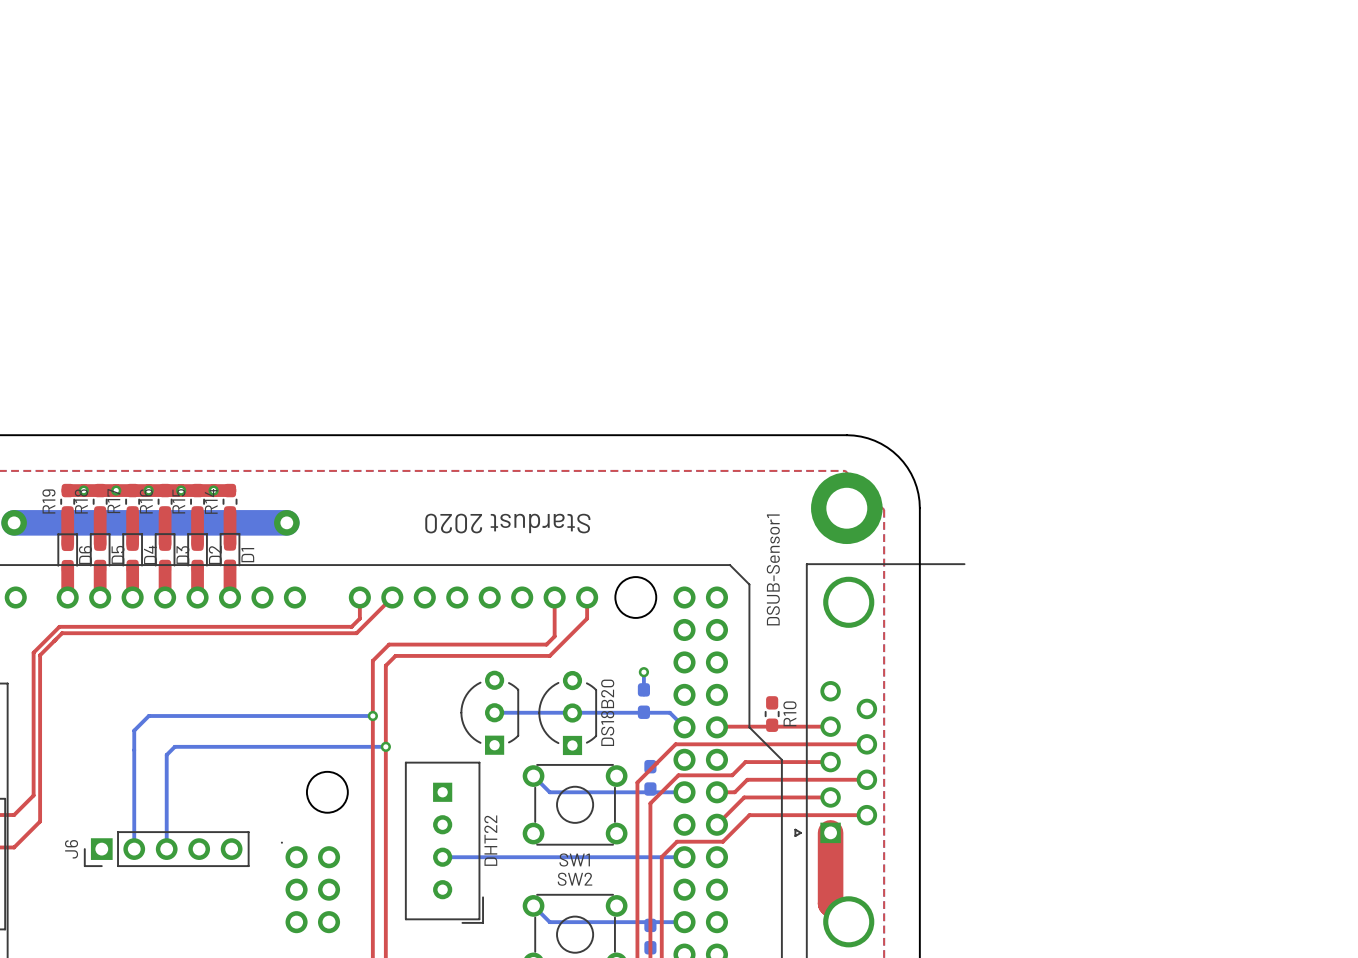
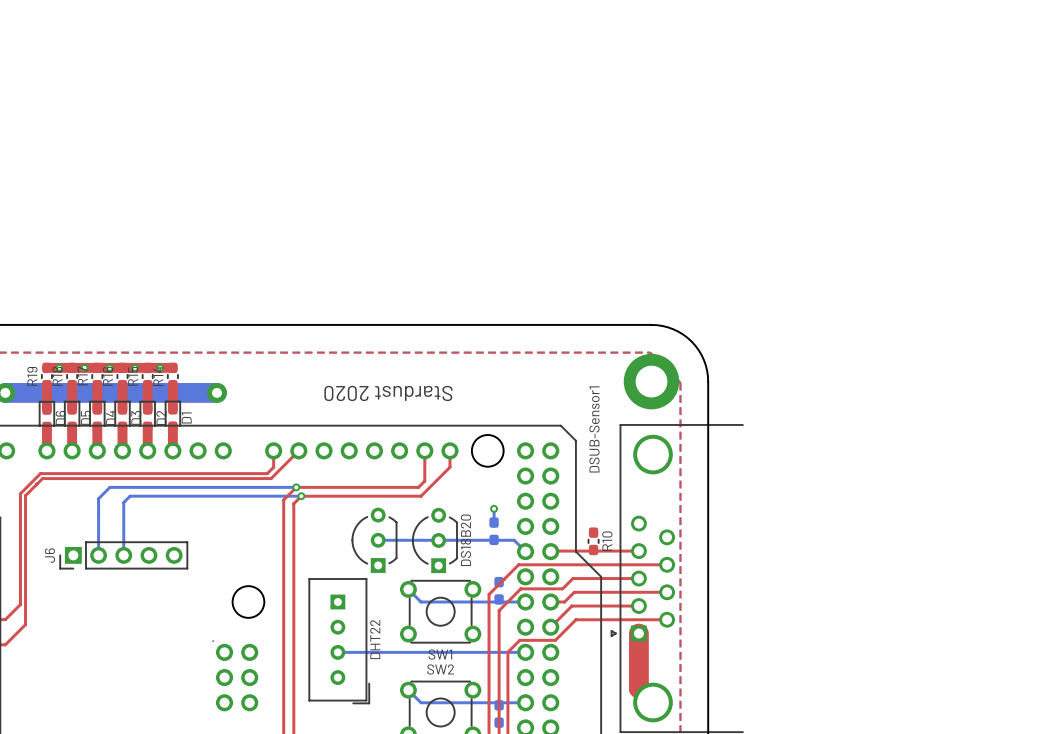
via: none -> (296, 487)
bottom track: none -> (301, 496) (130, 496) (123, 502) (123, 555)
via: none -> (301, 496)
bottom track: (372, 716) (148, 716) (134, 730) -> (296, 487) (109, 487) (98, 498) (98, 554)
via: (372, 716) -> none
bottom track: (134, 732) (134, 849) -> none
bottom track: (385, 746) (174, 746) (166, 754) (166, 849) -> none
via: (385, 746) -> none
J6 position: (166, 849) -> (123, 555)

